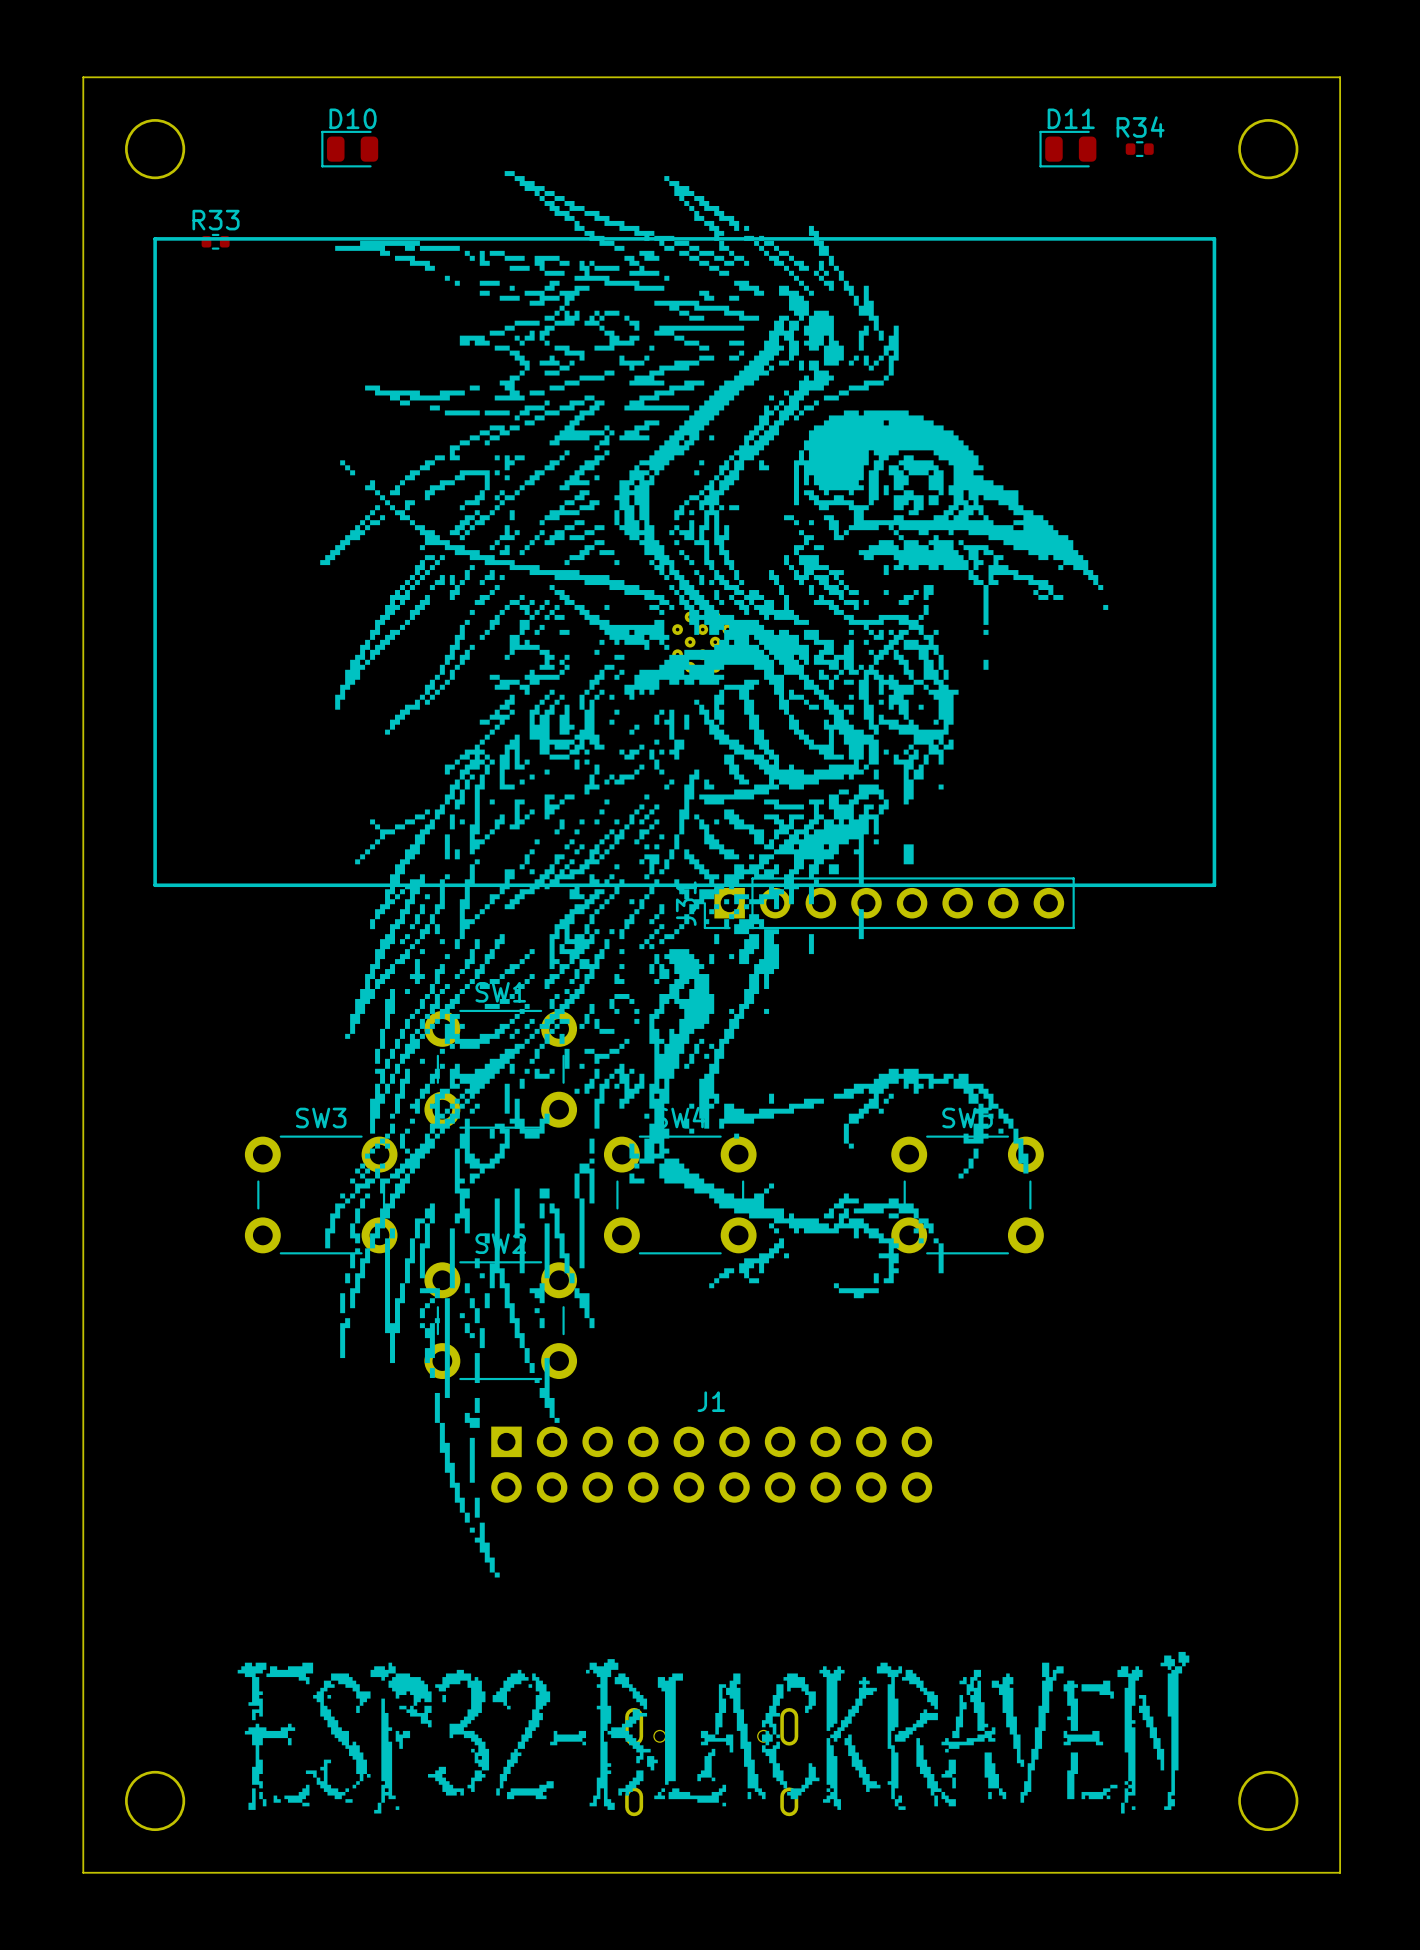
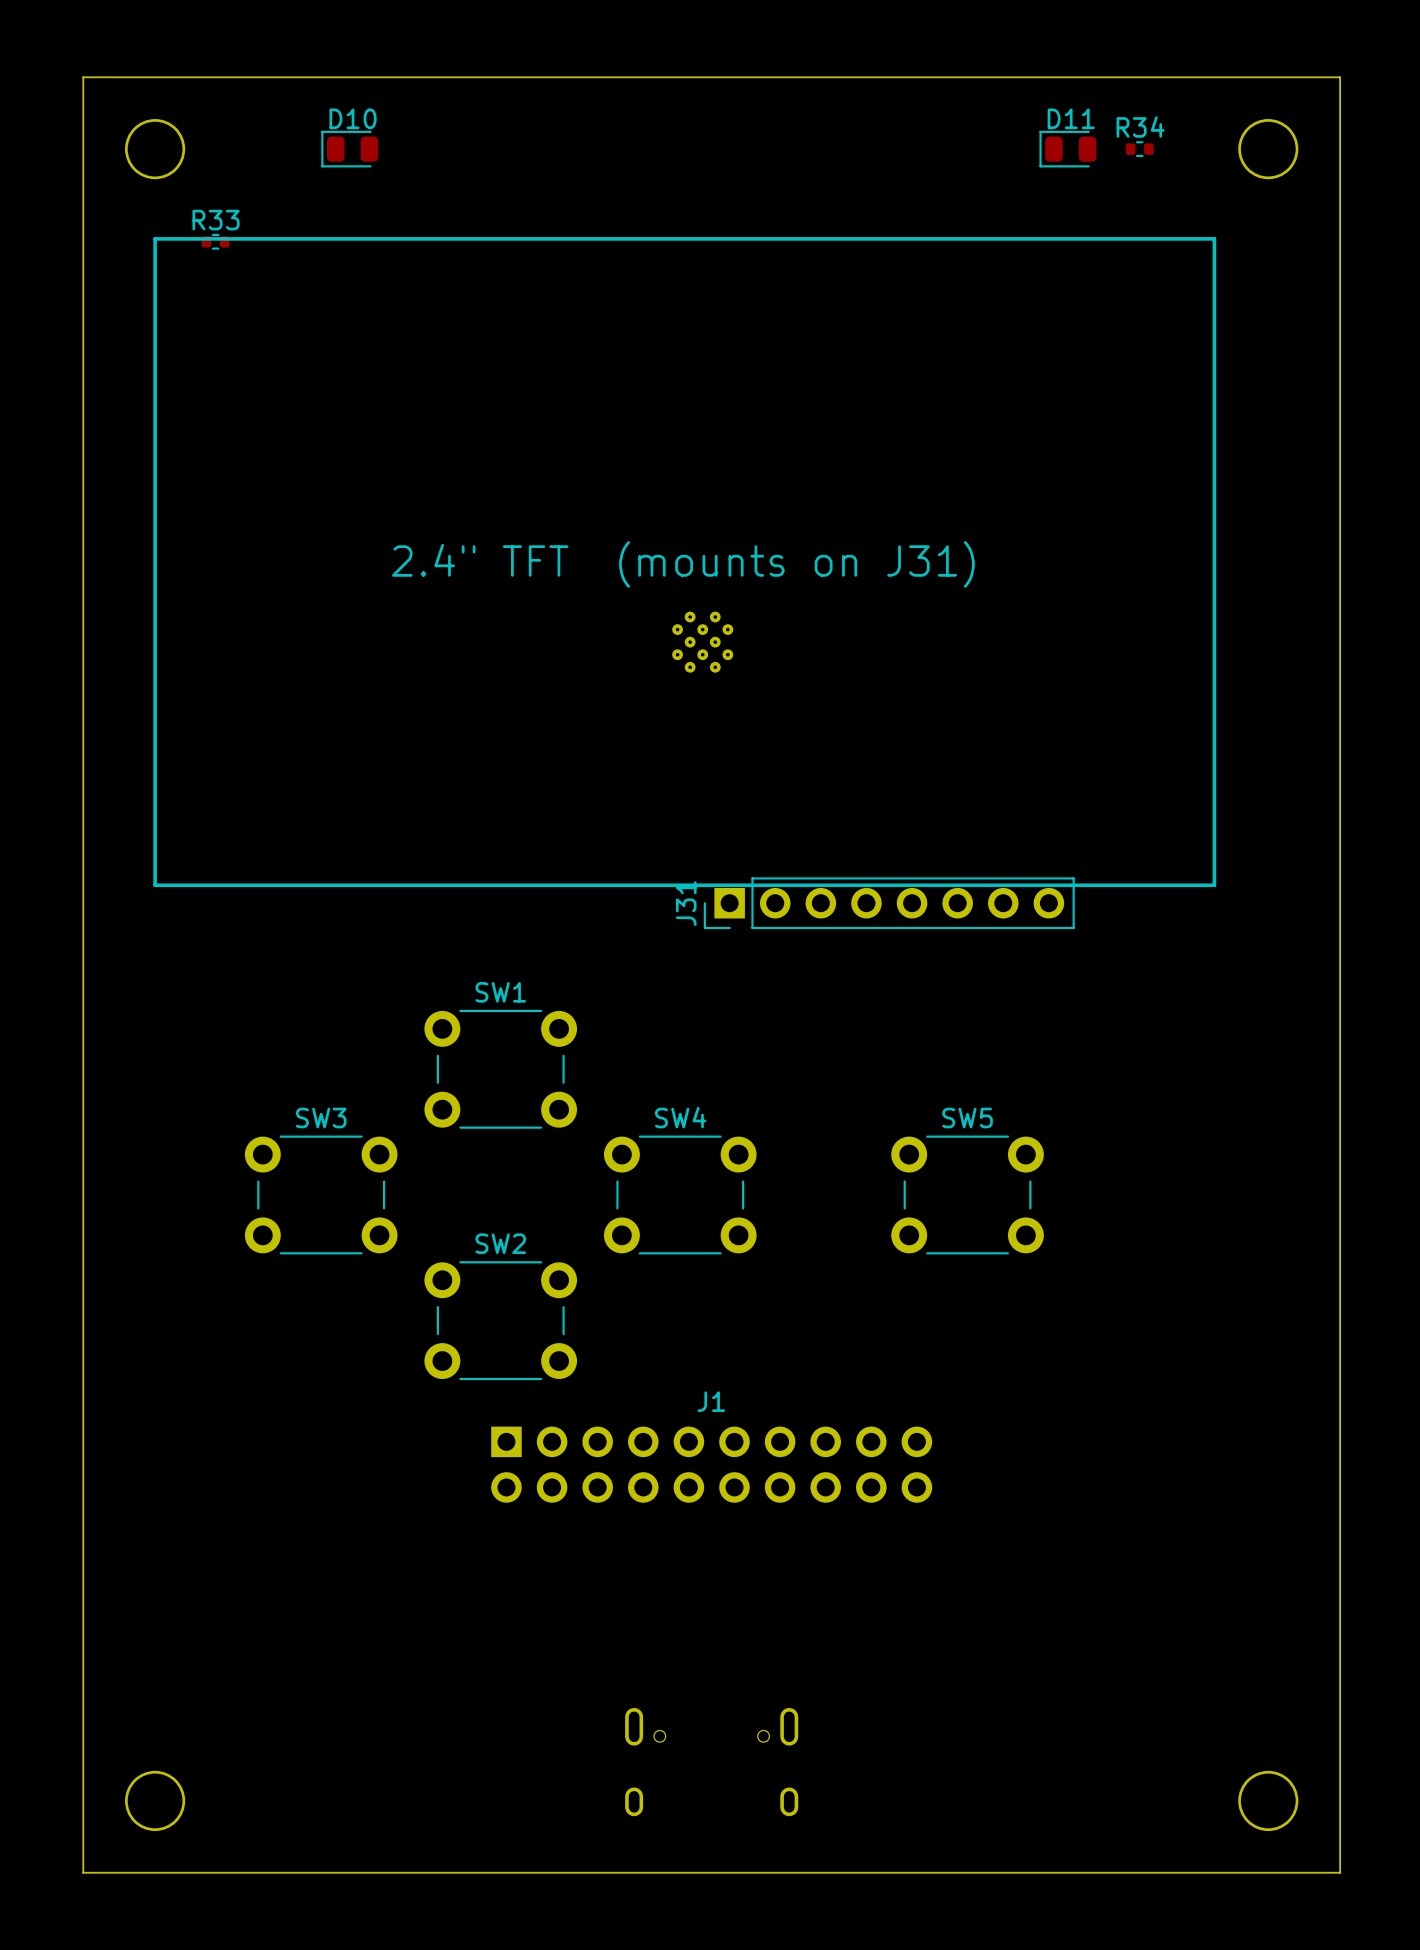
drawing: [320, 171, 1109, 1578] -> none
text: none -> 2.4" TFT (mounts on J31) (683, 564)
drawing: [237, 1651, 1190, 1814] -> none

